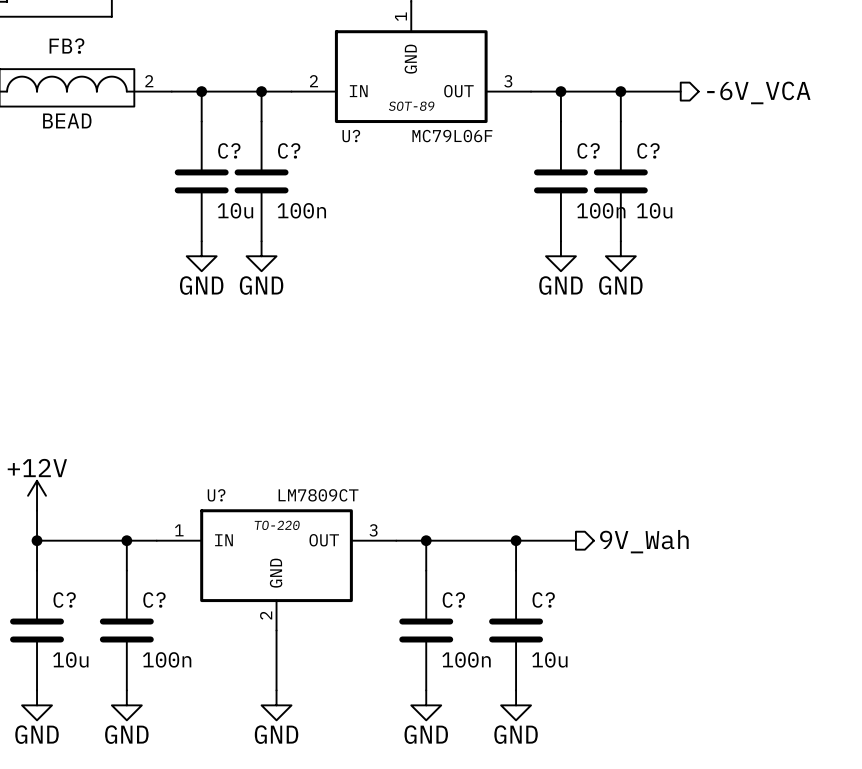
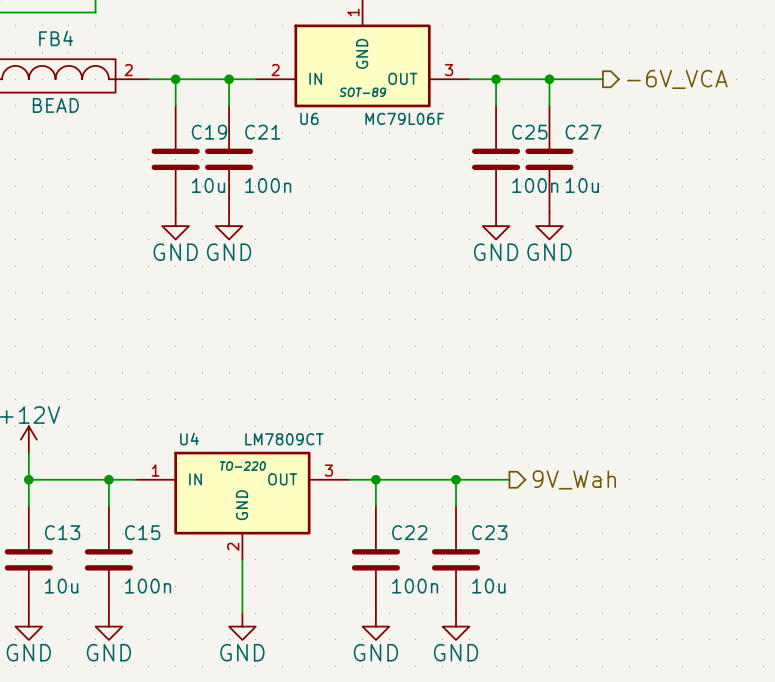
FB? name: FB? (66, 46) -> FB4 (56, 38)
U? name: U? (351, 136) -> U6 (309, 118)
C? name: C? (229, 150) -> C19 (209, 132)
C? name: C? (289, 150) -> C21 (262, 132)
C? name: C? (588, 150) -> C25 (529, 132)
C? name: C? (648, 150) -> C27 (583, 132)
U? name: U? (216, 495) -> U4 (189, 439)
C? name: C? (64, 600) -> C13 (62, 532)
C? name: C? (154, 600) -> C15 (142, 532)
C? name: C? (453, 600) -> C22 (409, 532)
C? name: C? (543, 600) -> C23 (489, 532)

